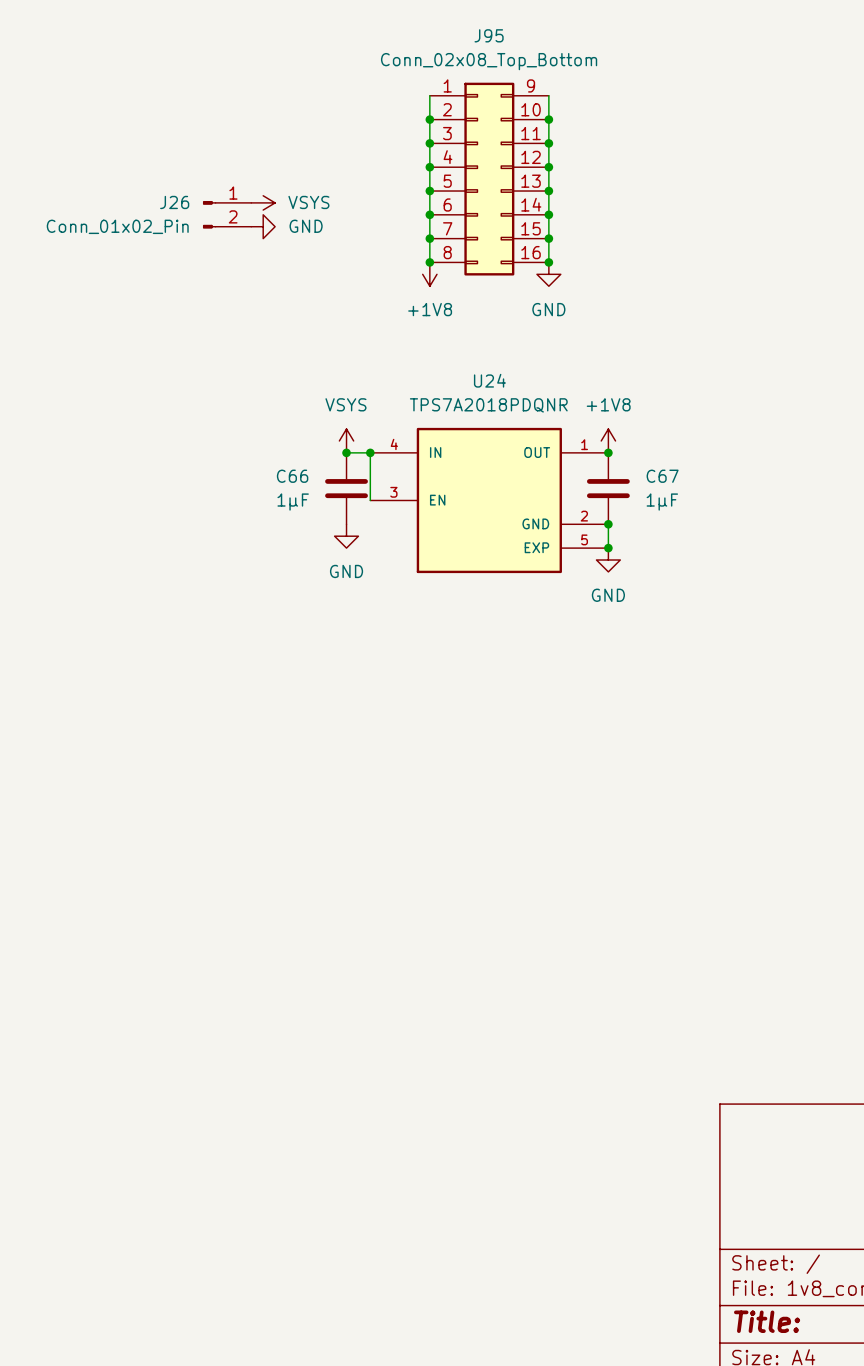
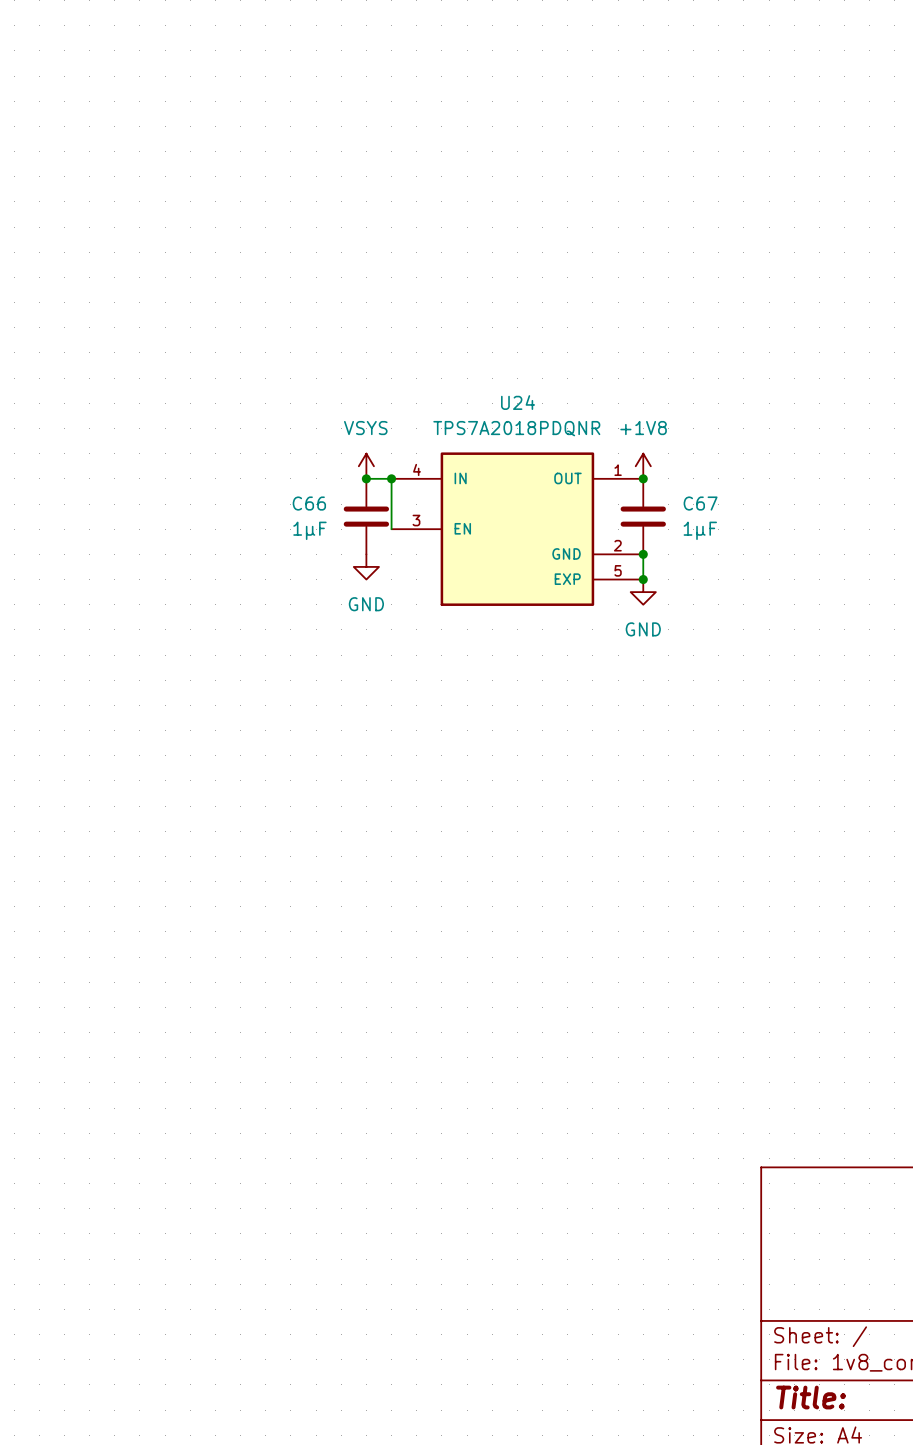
wire: (429, 95) (429, 262) -> none
wire: (548, 95) (548, 262) -> none
junction: (429, 119) -> none
junction: (548, 119) -> none
junction: (429, 143) -> none
junction: (548, 143) -> none
junction: (429, 167) -> none
junction: (548, 167) -> none
J95: Conn_02x08_Top_Bottom (489, 179) -> none
junction: (429, 191) -> none
junction: (548, 191) -> none
power symbol: VSYS (263, 202) -> none
J26: Conn_01x02_Pin (227, 214) -> none
junction: (429, 214) -> none
junction: (548, 214) -> none
power symbol: GND (263, 226) -> none
junction: (429, 238) -> none
junction: (548, 238) -> none
junction: (429, 262) -> none
junction: (548, 262) -> none
power symbol: +1V8 (429, 274) -> none
power symbol: GND (548, 274) -> none

